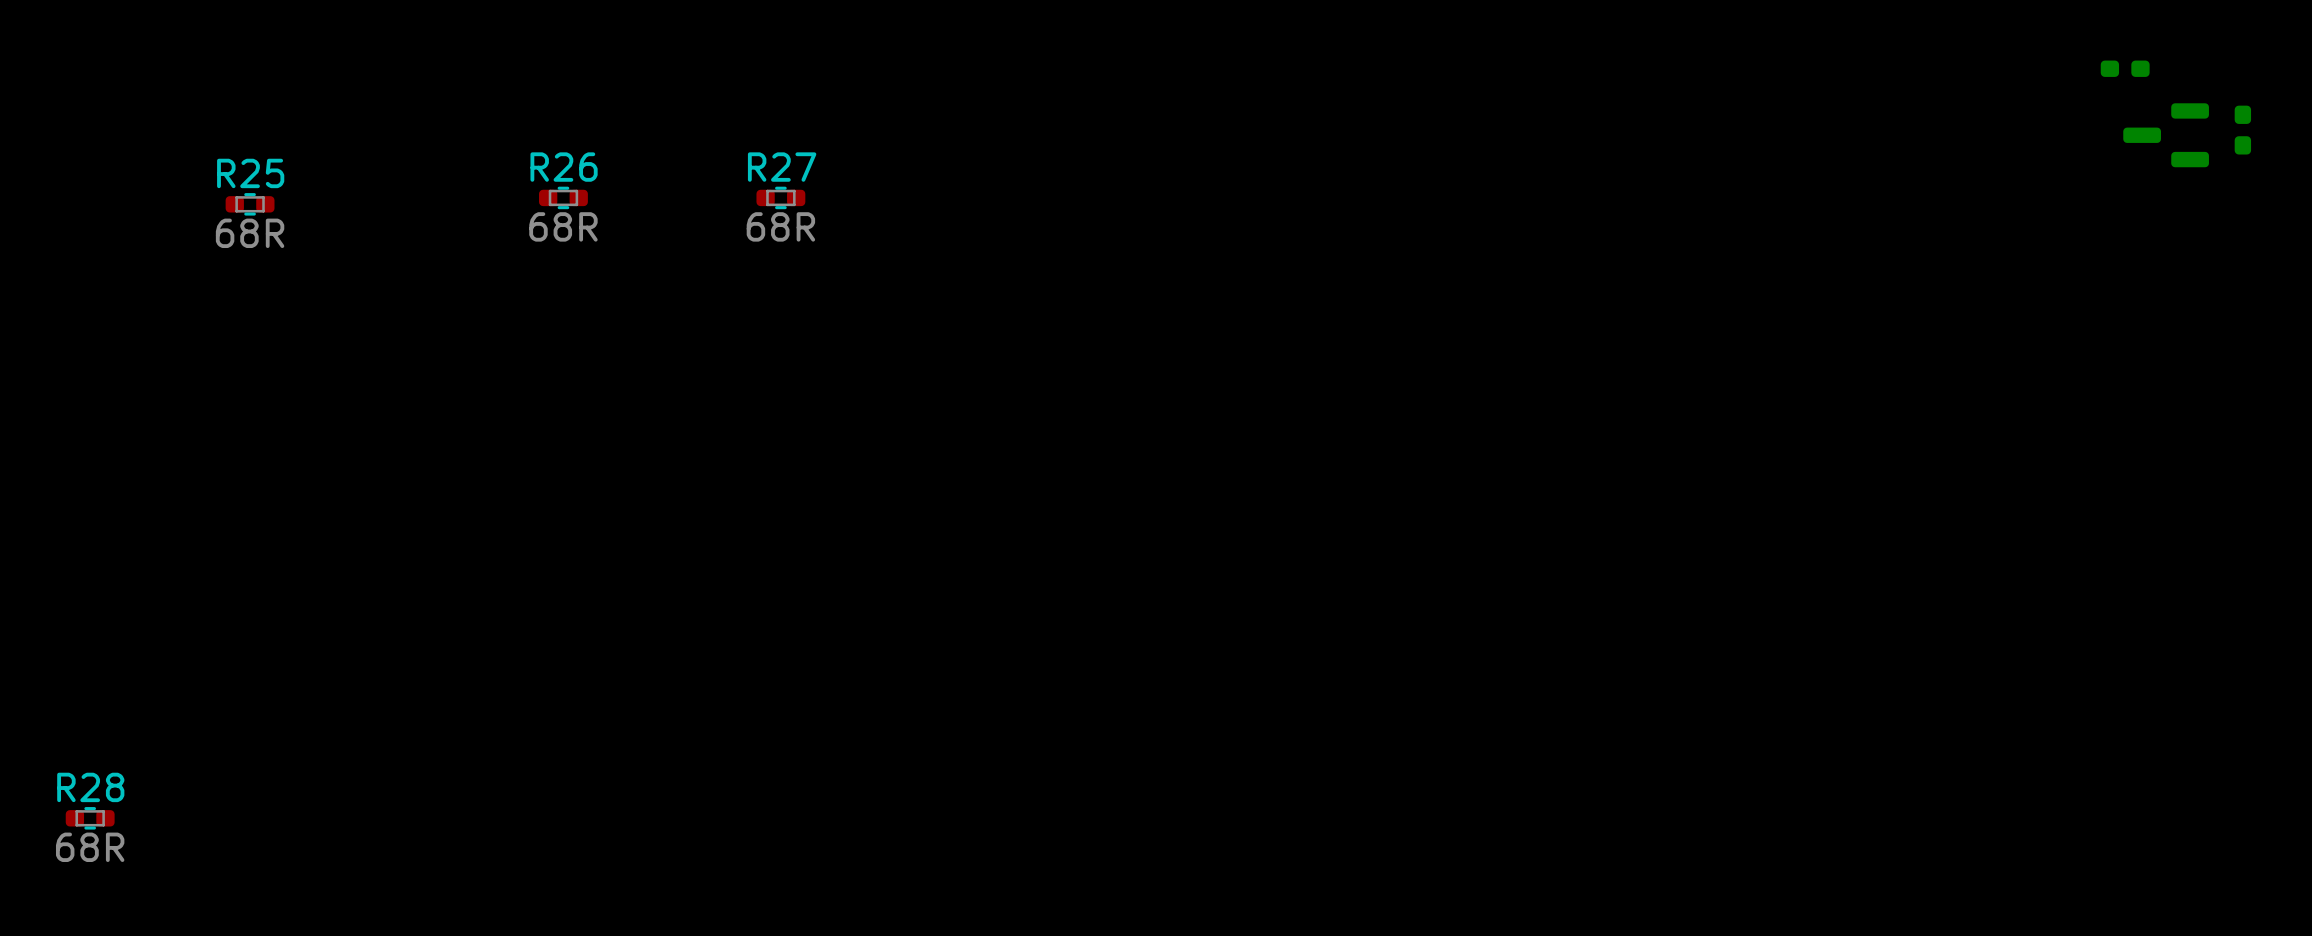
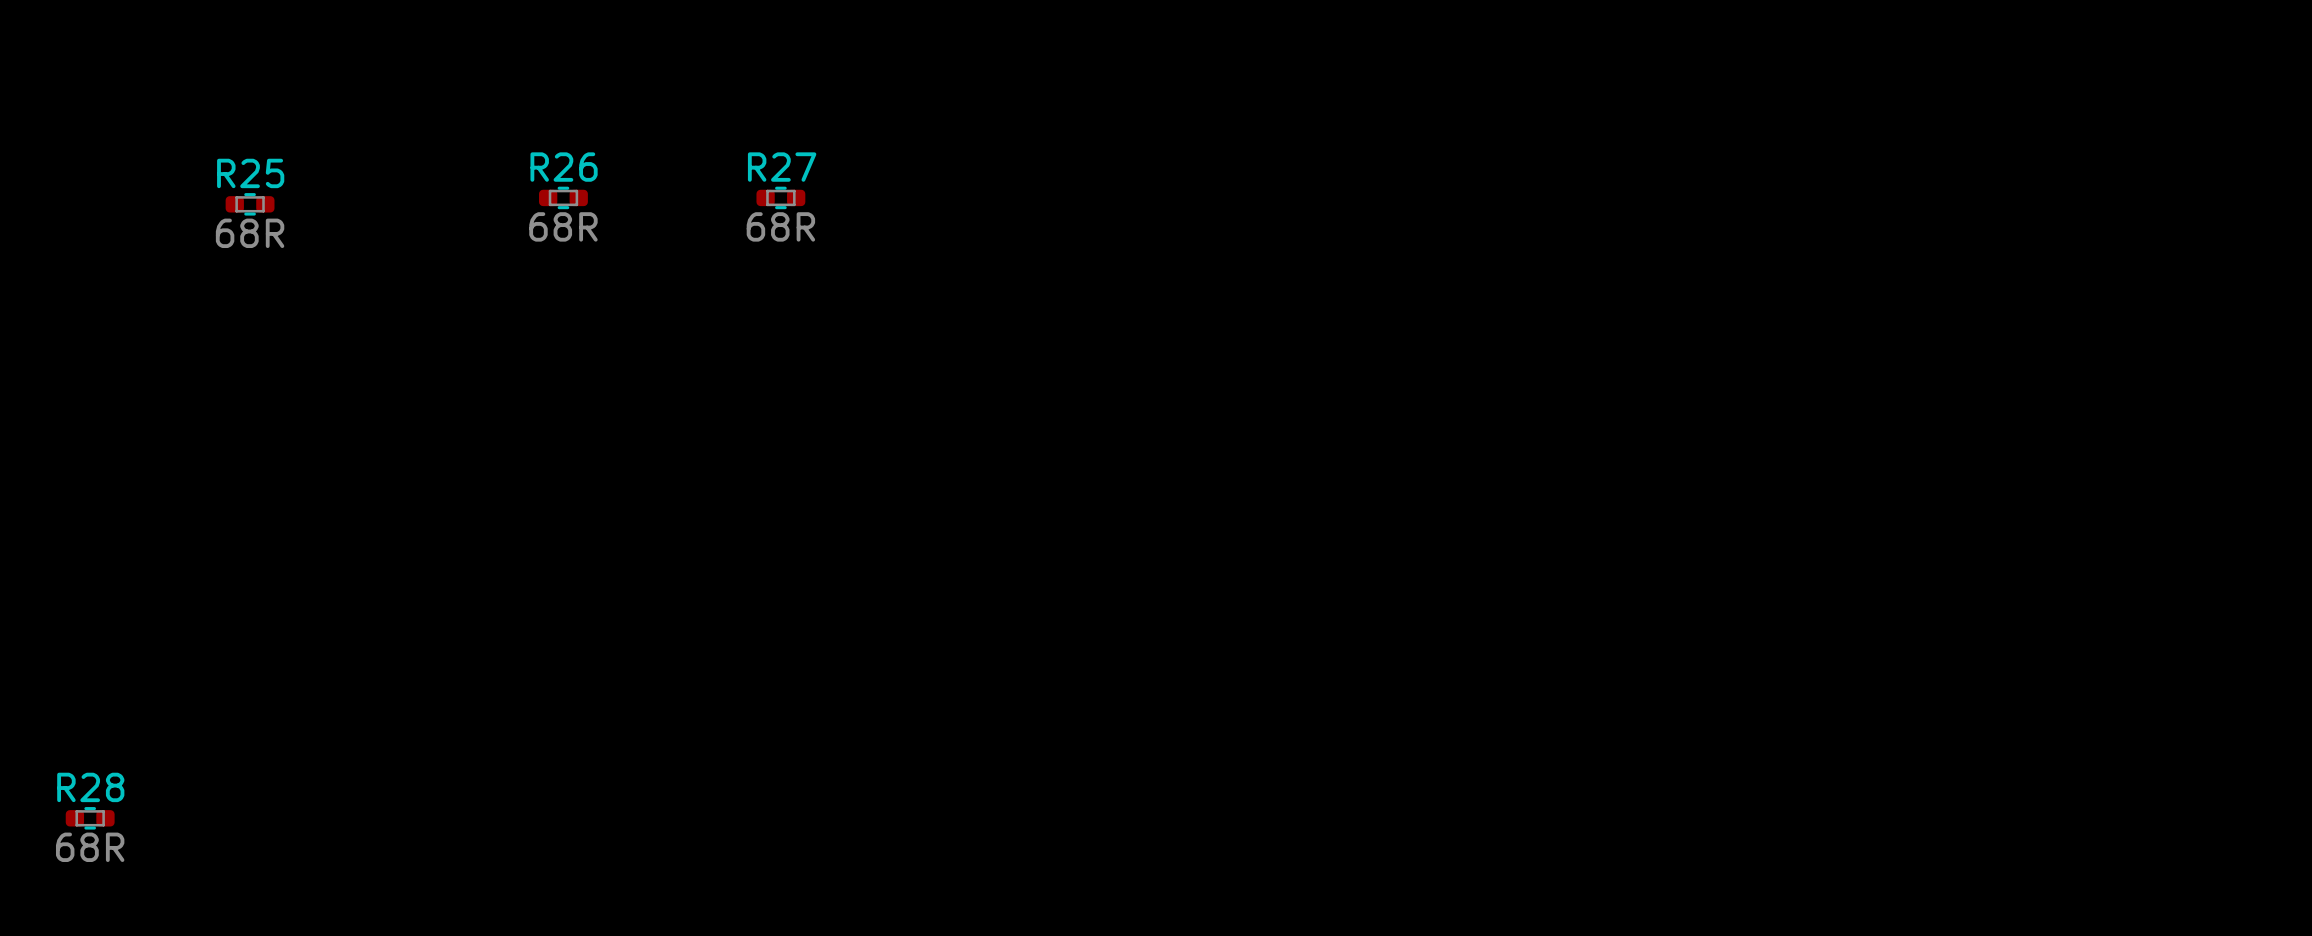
part: (2125, 68) -> none
part: (2242, 130) -> none
part: (2166, 135) -> none

